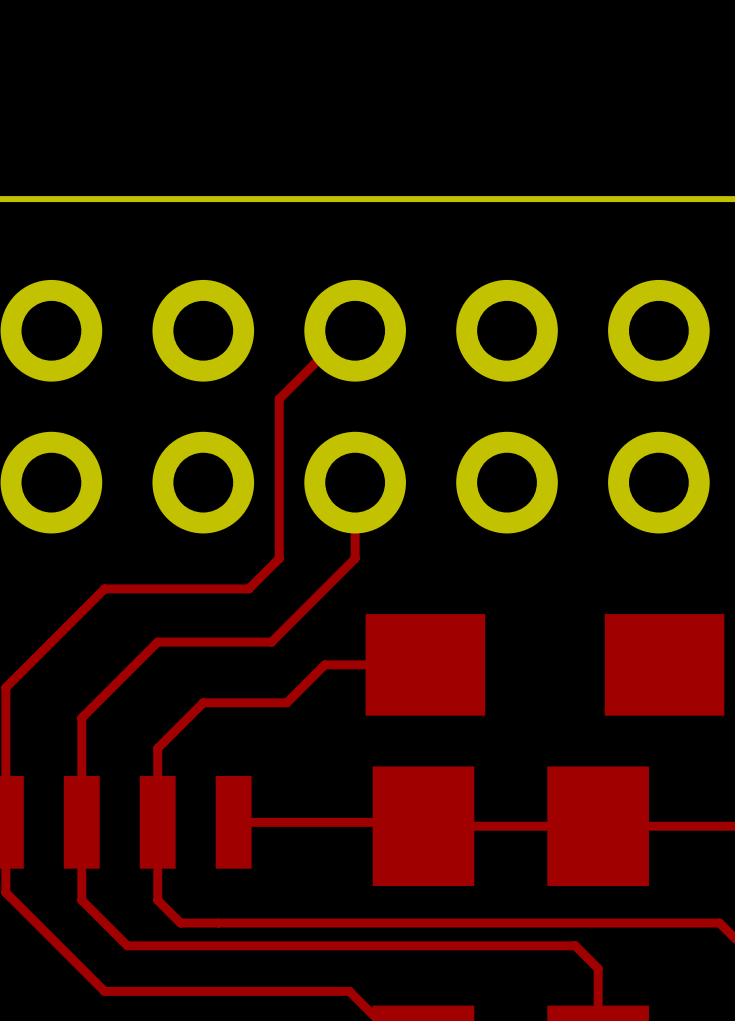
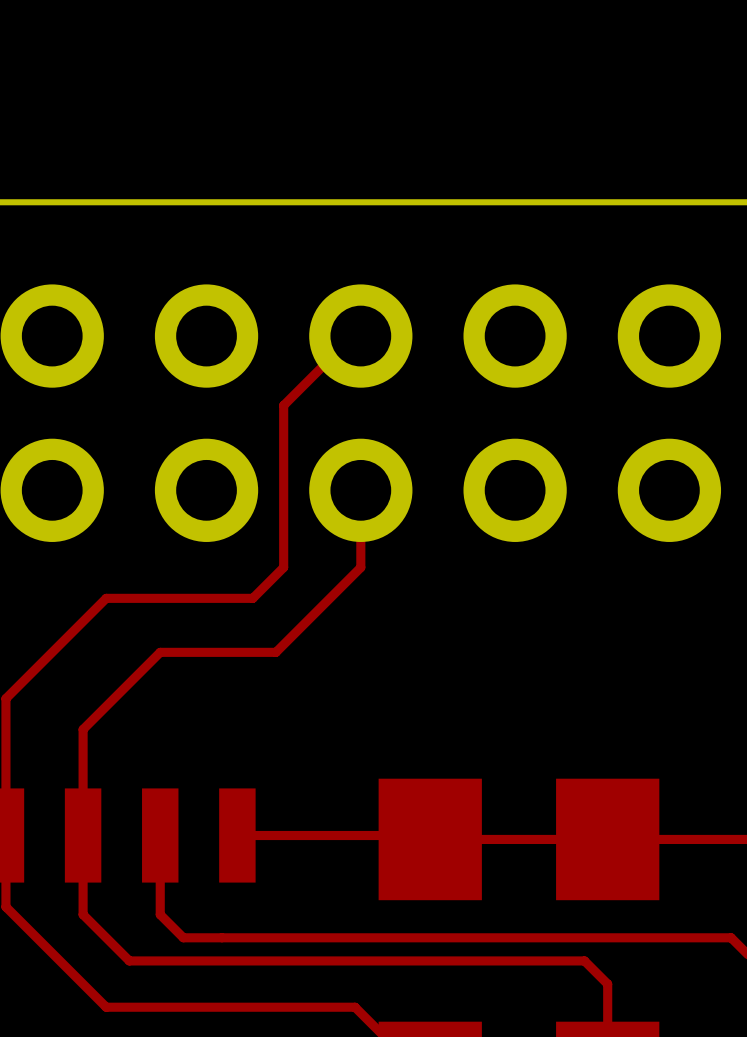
top track: (425, 664) (324, 664) (286, 702) (203, 702) (157, 748) (157, 822) -> none
part: (544, 664) -> none

